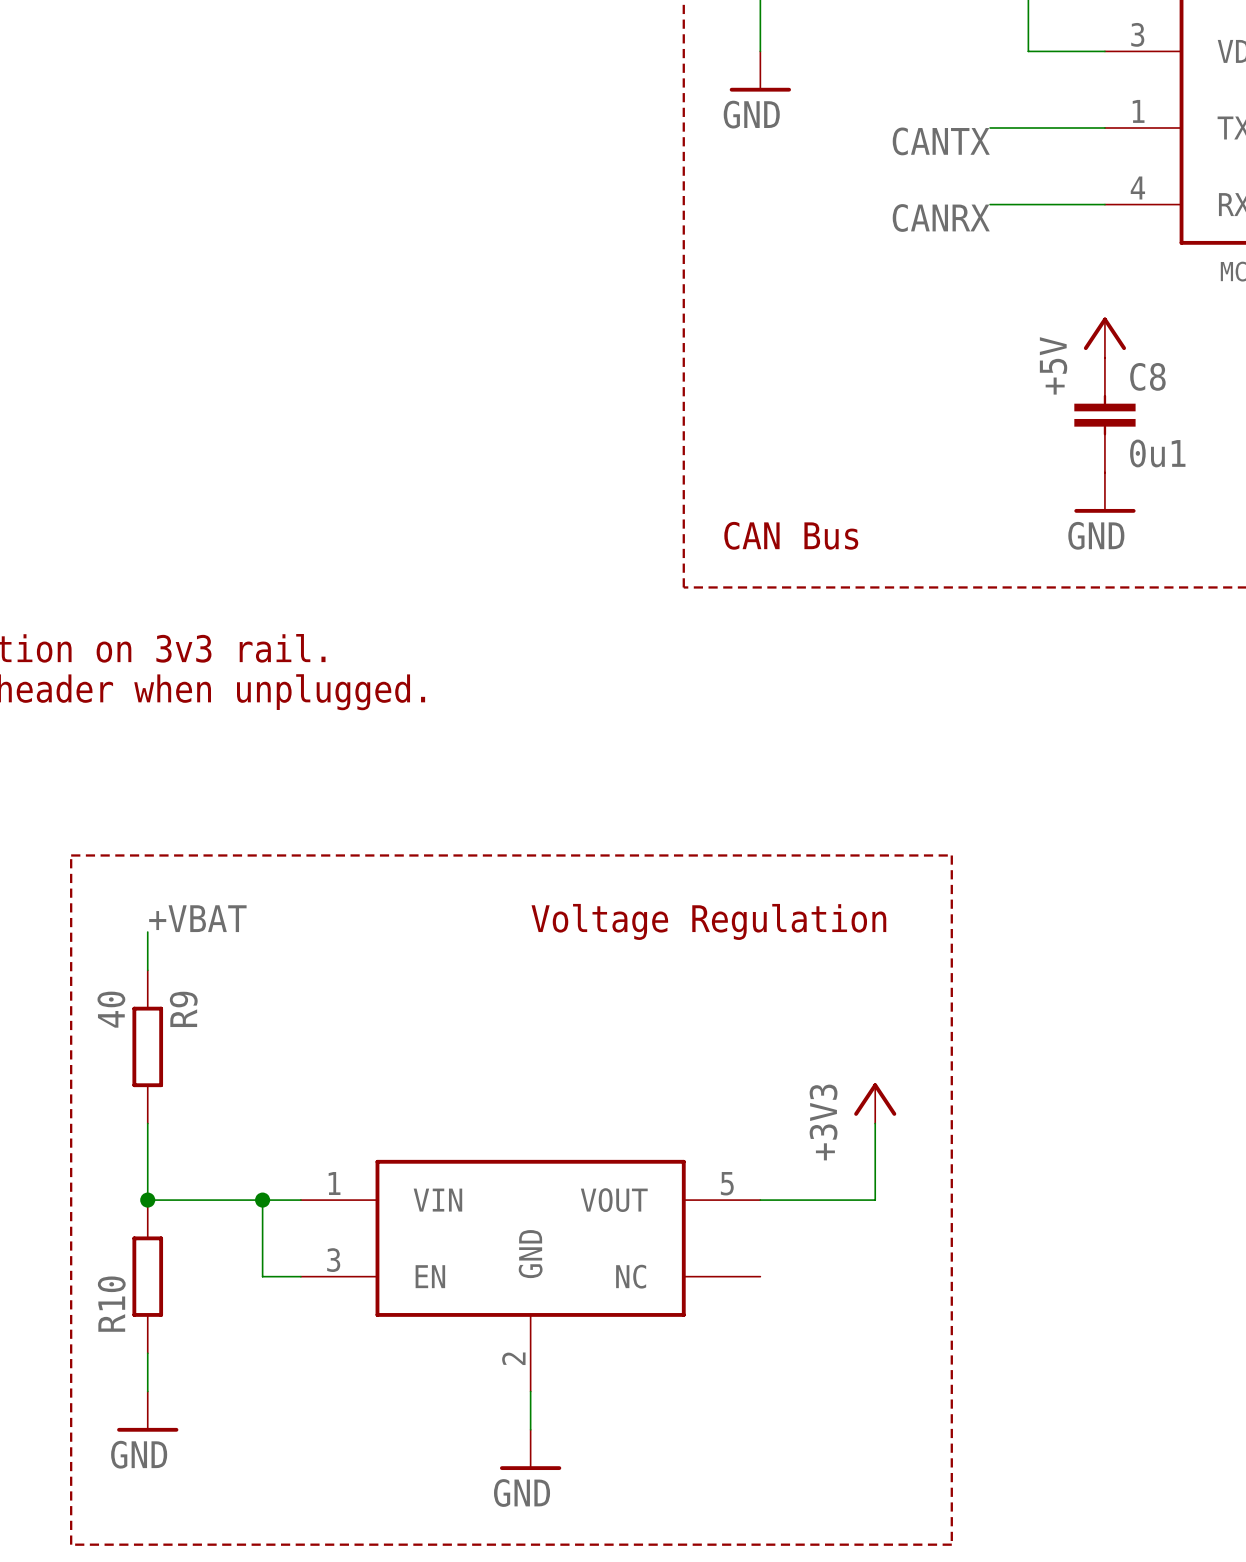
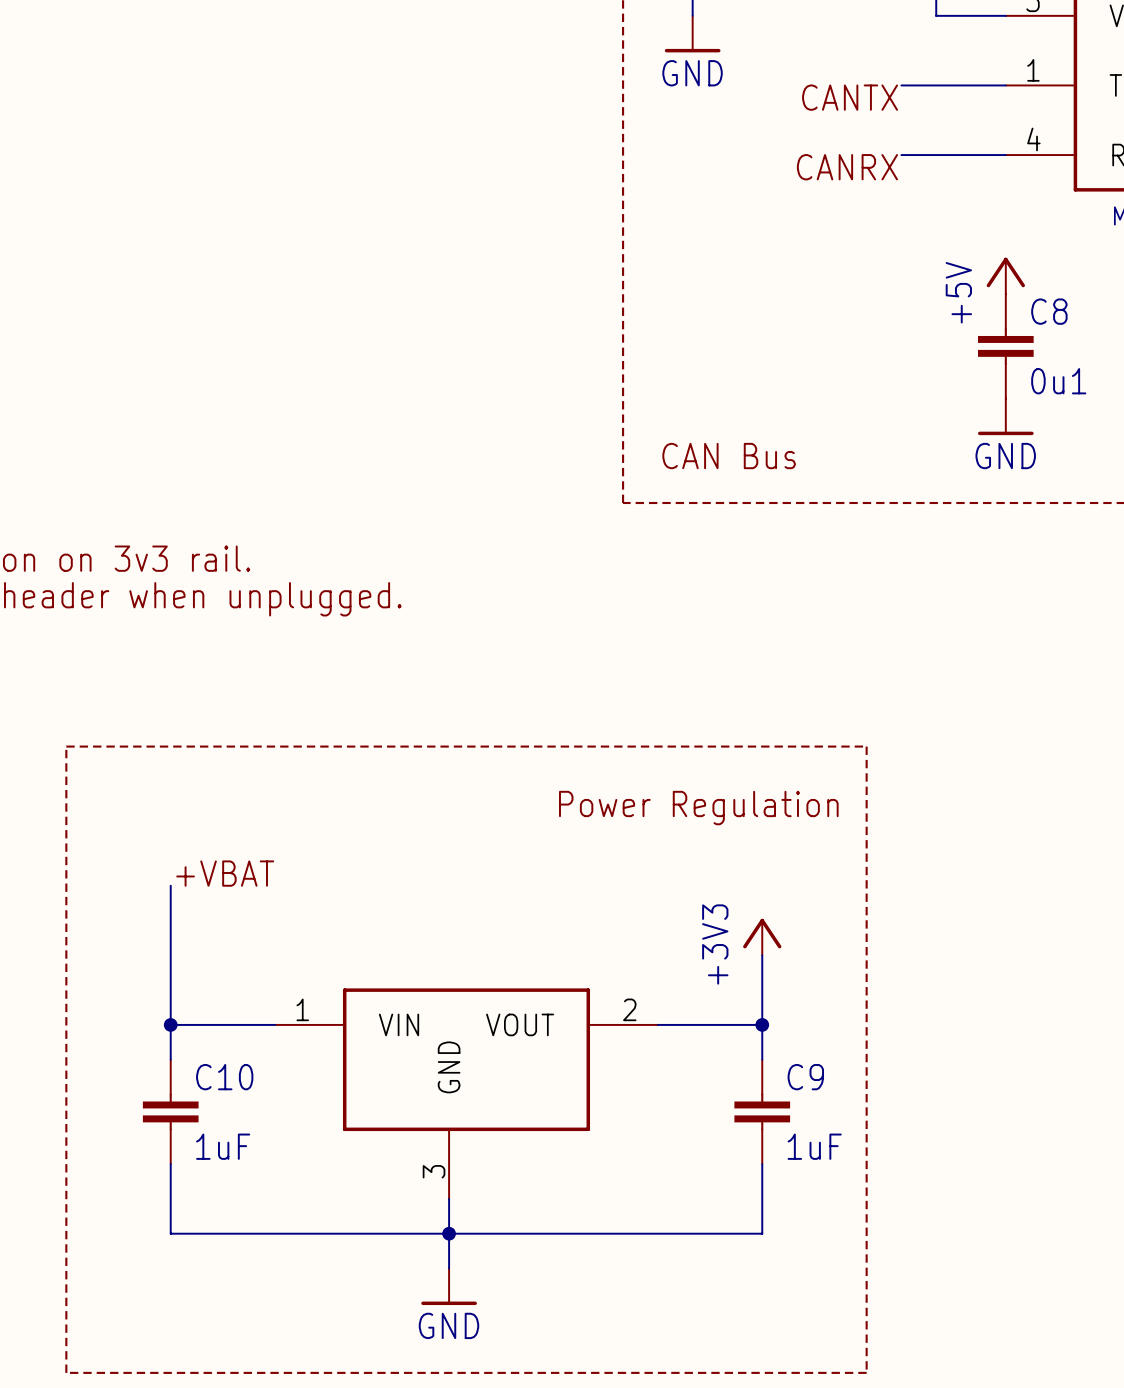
label position: +VBAT (197, 918) -> +VBAT (225, 873)
text: Voltage Regulation (708, 921) -> Power Regulation (698, 808)
wire: (147, 932) (147, 970) -> none
wire: none -> (170, 885) (170, 1059)
R9: 40 (147, 1046) -> none
wire: none -> (762, 955) (762, 1059)
power symbol position: +3V3 (875, 1103) -> +3V3 (762, 937)
wire: (147, 1123) (147, 1200) (300, 1200) -> none
wire: (875, 1123) (875, 1200) (760, 1200) -> none
wire: none -> (170, 1024) (275, 1024)
junction: none -> (170, 1024)
wire: none -> (657, 1024) (762, 1024)
junction: none -> (762, 1024)
junction: (147, 1200) -> none
wire: (262, 1200) (262, 1276) (300, 1276) -> none
junction: (262, 1200) -> none
part: none -> (466, 1093)
C10: none -> 1uF (170, 1111)
C9: none -> 1uF (762, 1111)
part: (530, 1275) -> none
R10: (147, 1276) -> none
wire: none -> (170, 1164) (170, 1233) (762, 1233) (762, 1164)
wire: (147, 1353) (147, 1391) -> none
wire: none -> (449, 1198) (449, 1268)
junction: none -> (449, 1233)
wire: (530, 1391) (530, 1429) -> none
power symbol: GND (147, 1411) -> none
power symbol position: GND (530, 1449) -> GND (449, 1286)

